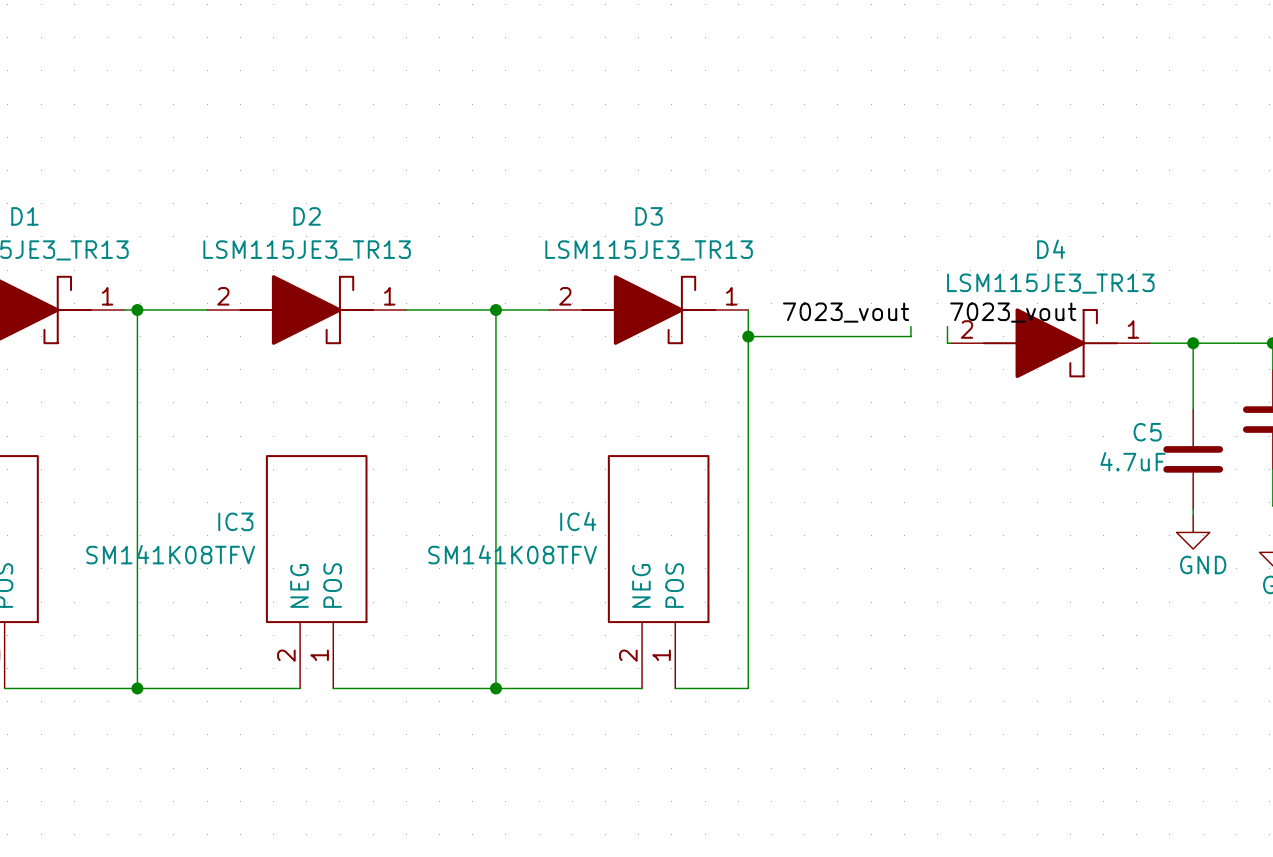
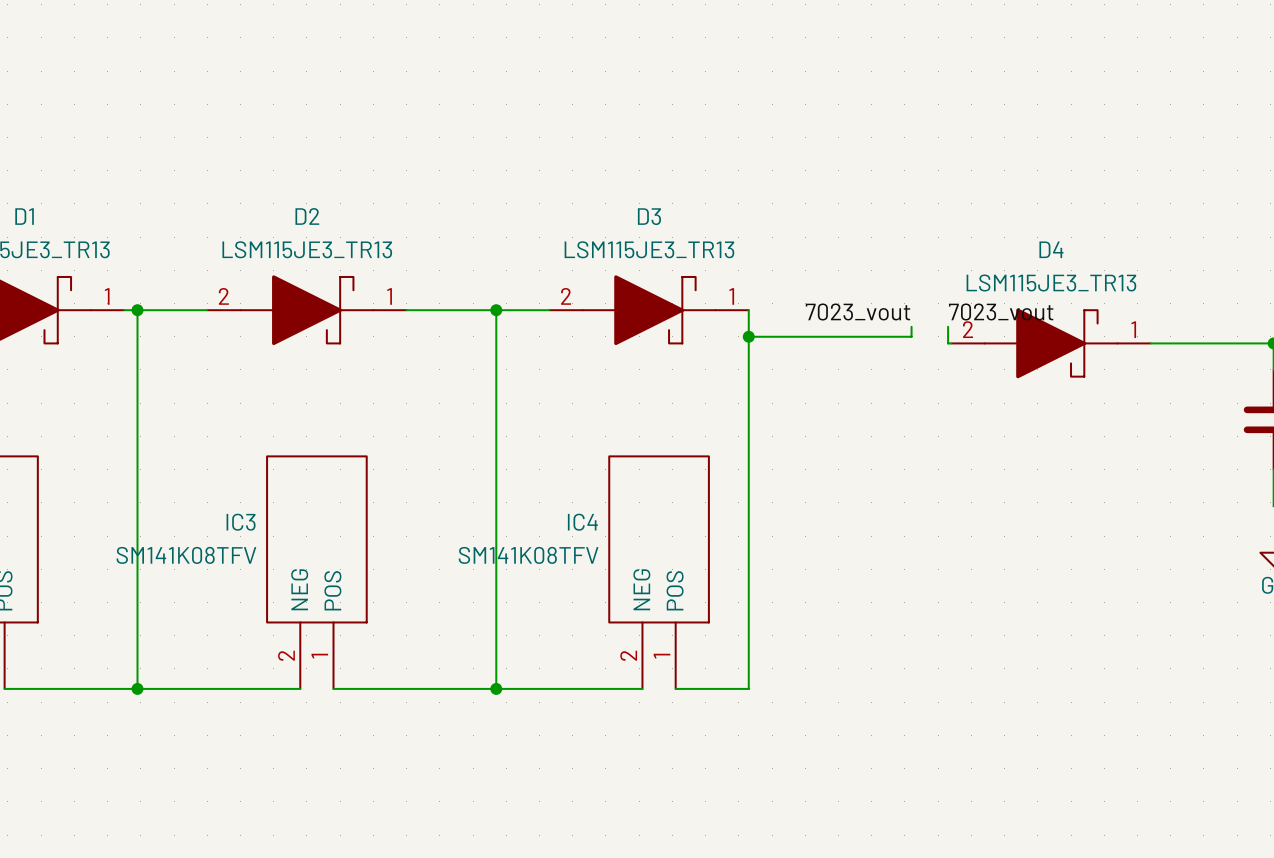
wire: (1193, 343) (1193, 409) -> none
junction: (1193, 343) -> none
C5: 4.7uF (1193, 459) -> none
wire: (1193, 509) (1193, 515) -> none
power symbol: GND (1193, 532) -> none

